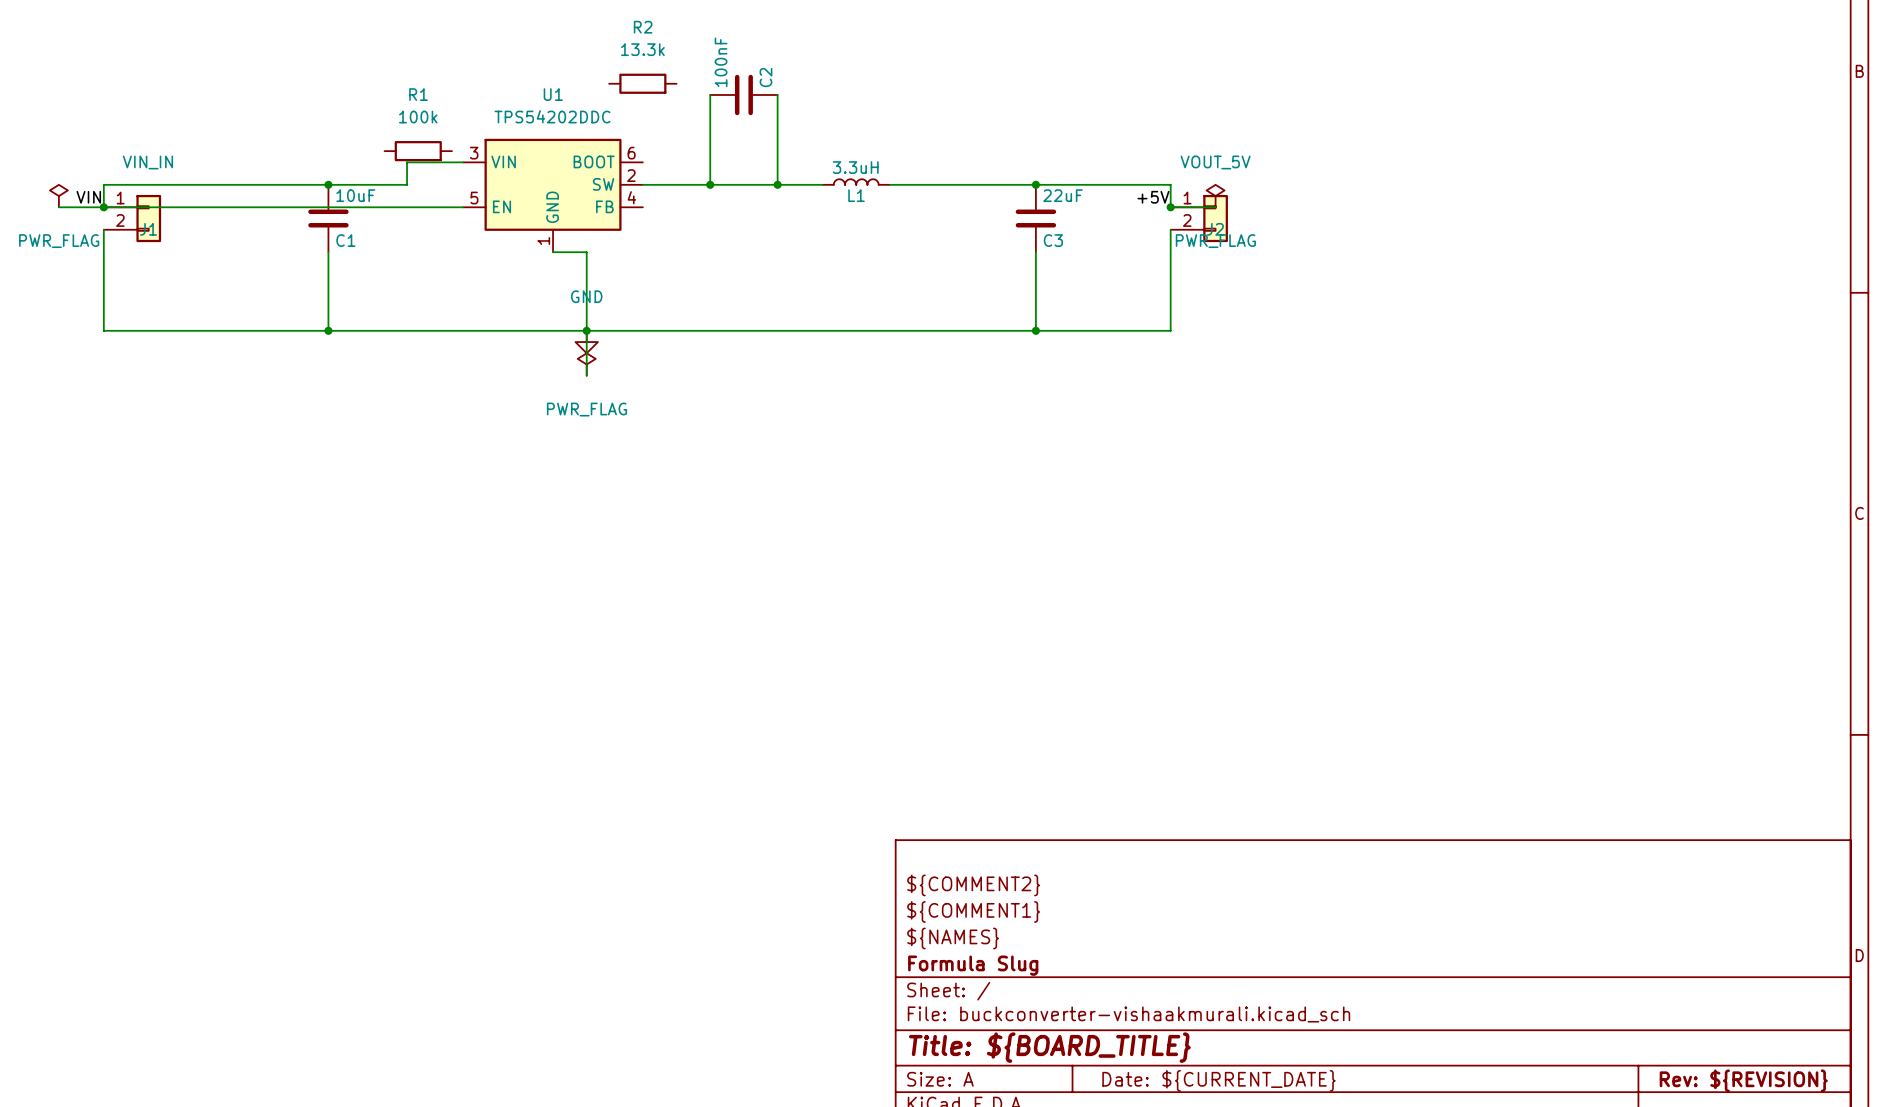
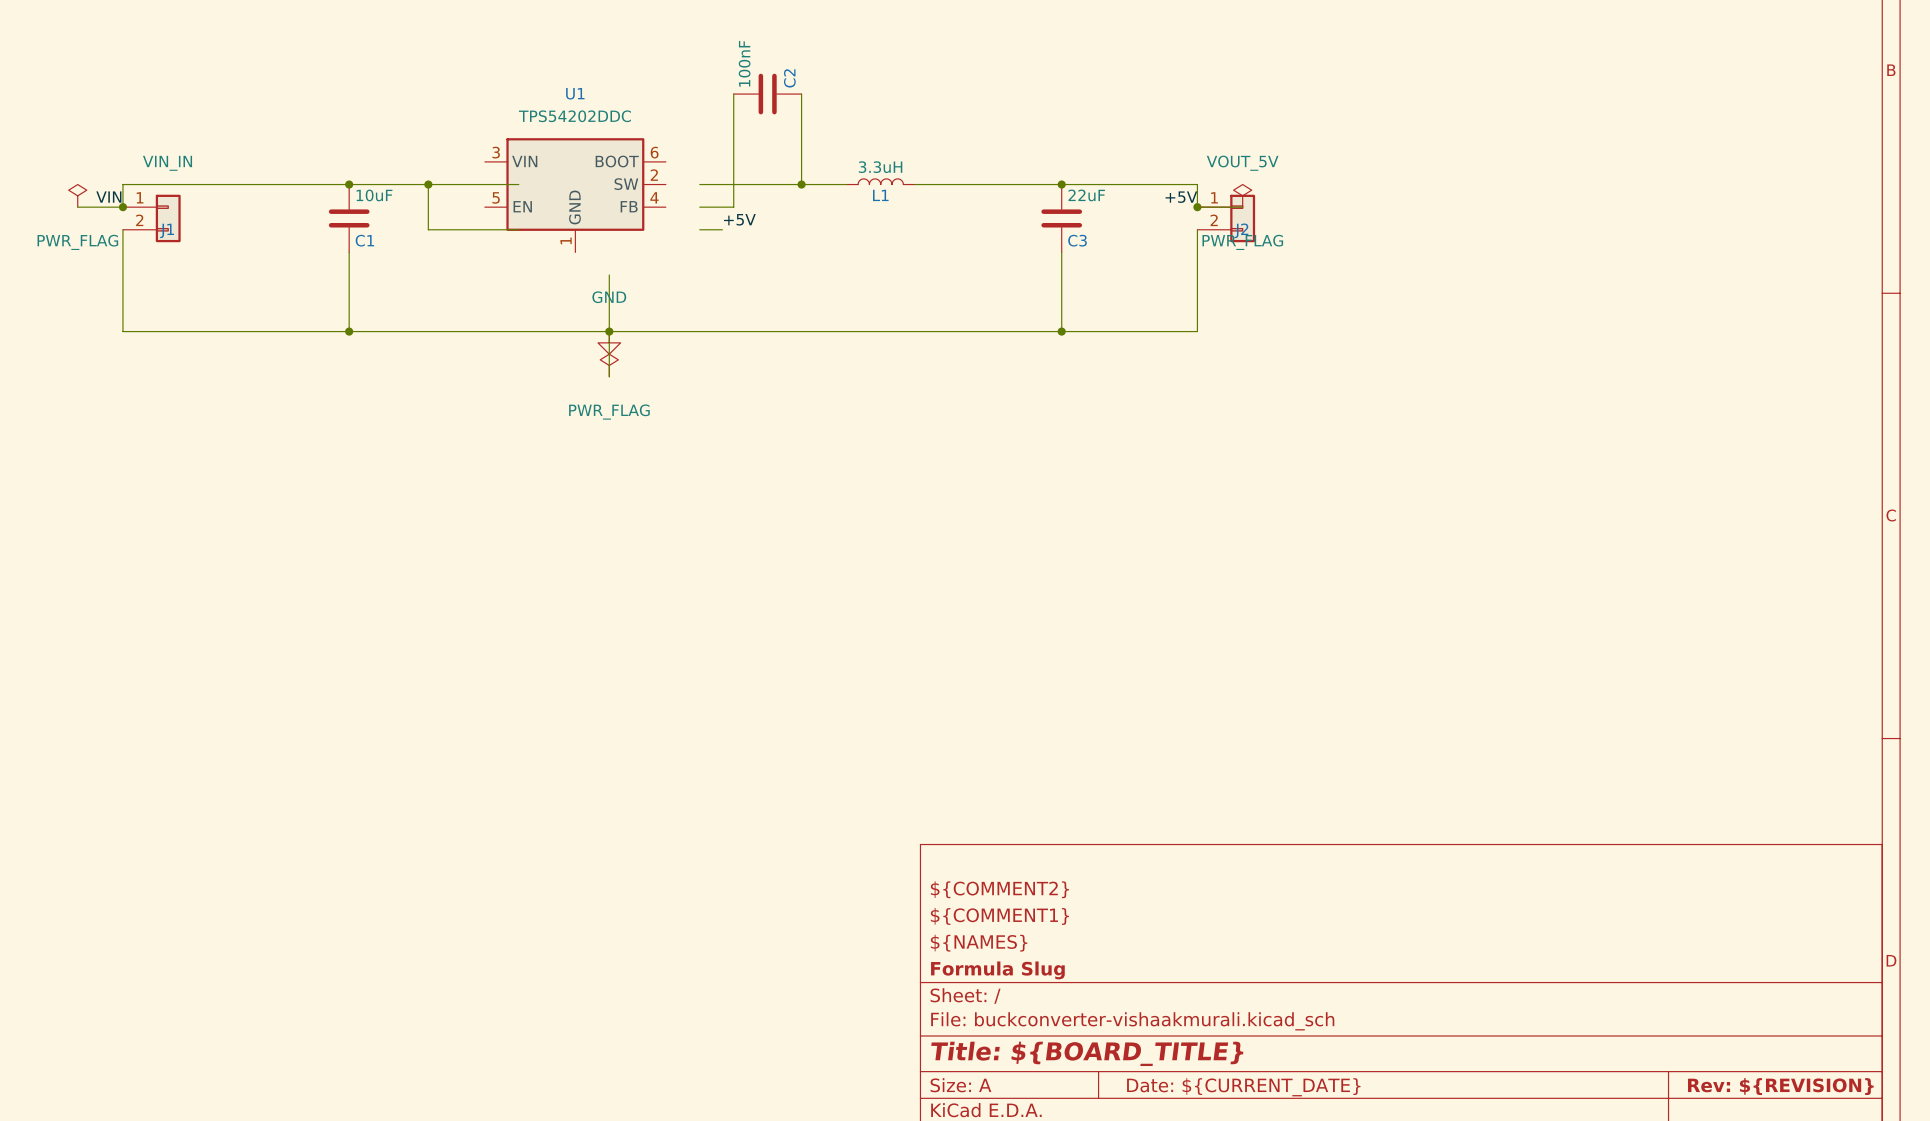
R2: 13.3k (642, 83) -> none
R1: 100k (418, 151) -> none
wire: (463, 162) (407, 162) (407, 184) -> none
junction: none -> (428, 184)
wire: none -> (518, 184) (428, 184) (428, 229) (518, 229)
wire: (642, 184) (676, 184) -> none
wire: none -> (733, 184) (733, 207) (699, 207)
junction: (710, 184) -> none
wire: (103, 207) (463, 207) -> none
label: none -> +5V (739, 219)
wire: none -> (699, 229) (722, 229)
wire: (553, 252) (586, 252) (586, 274) -> none

